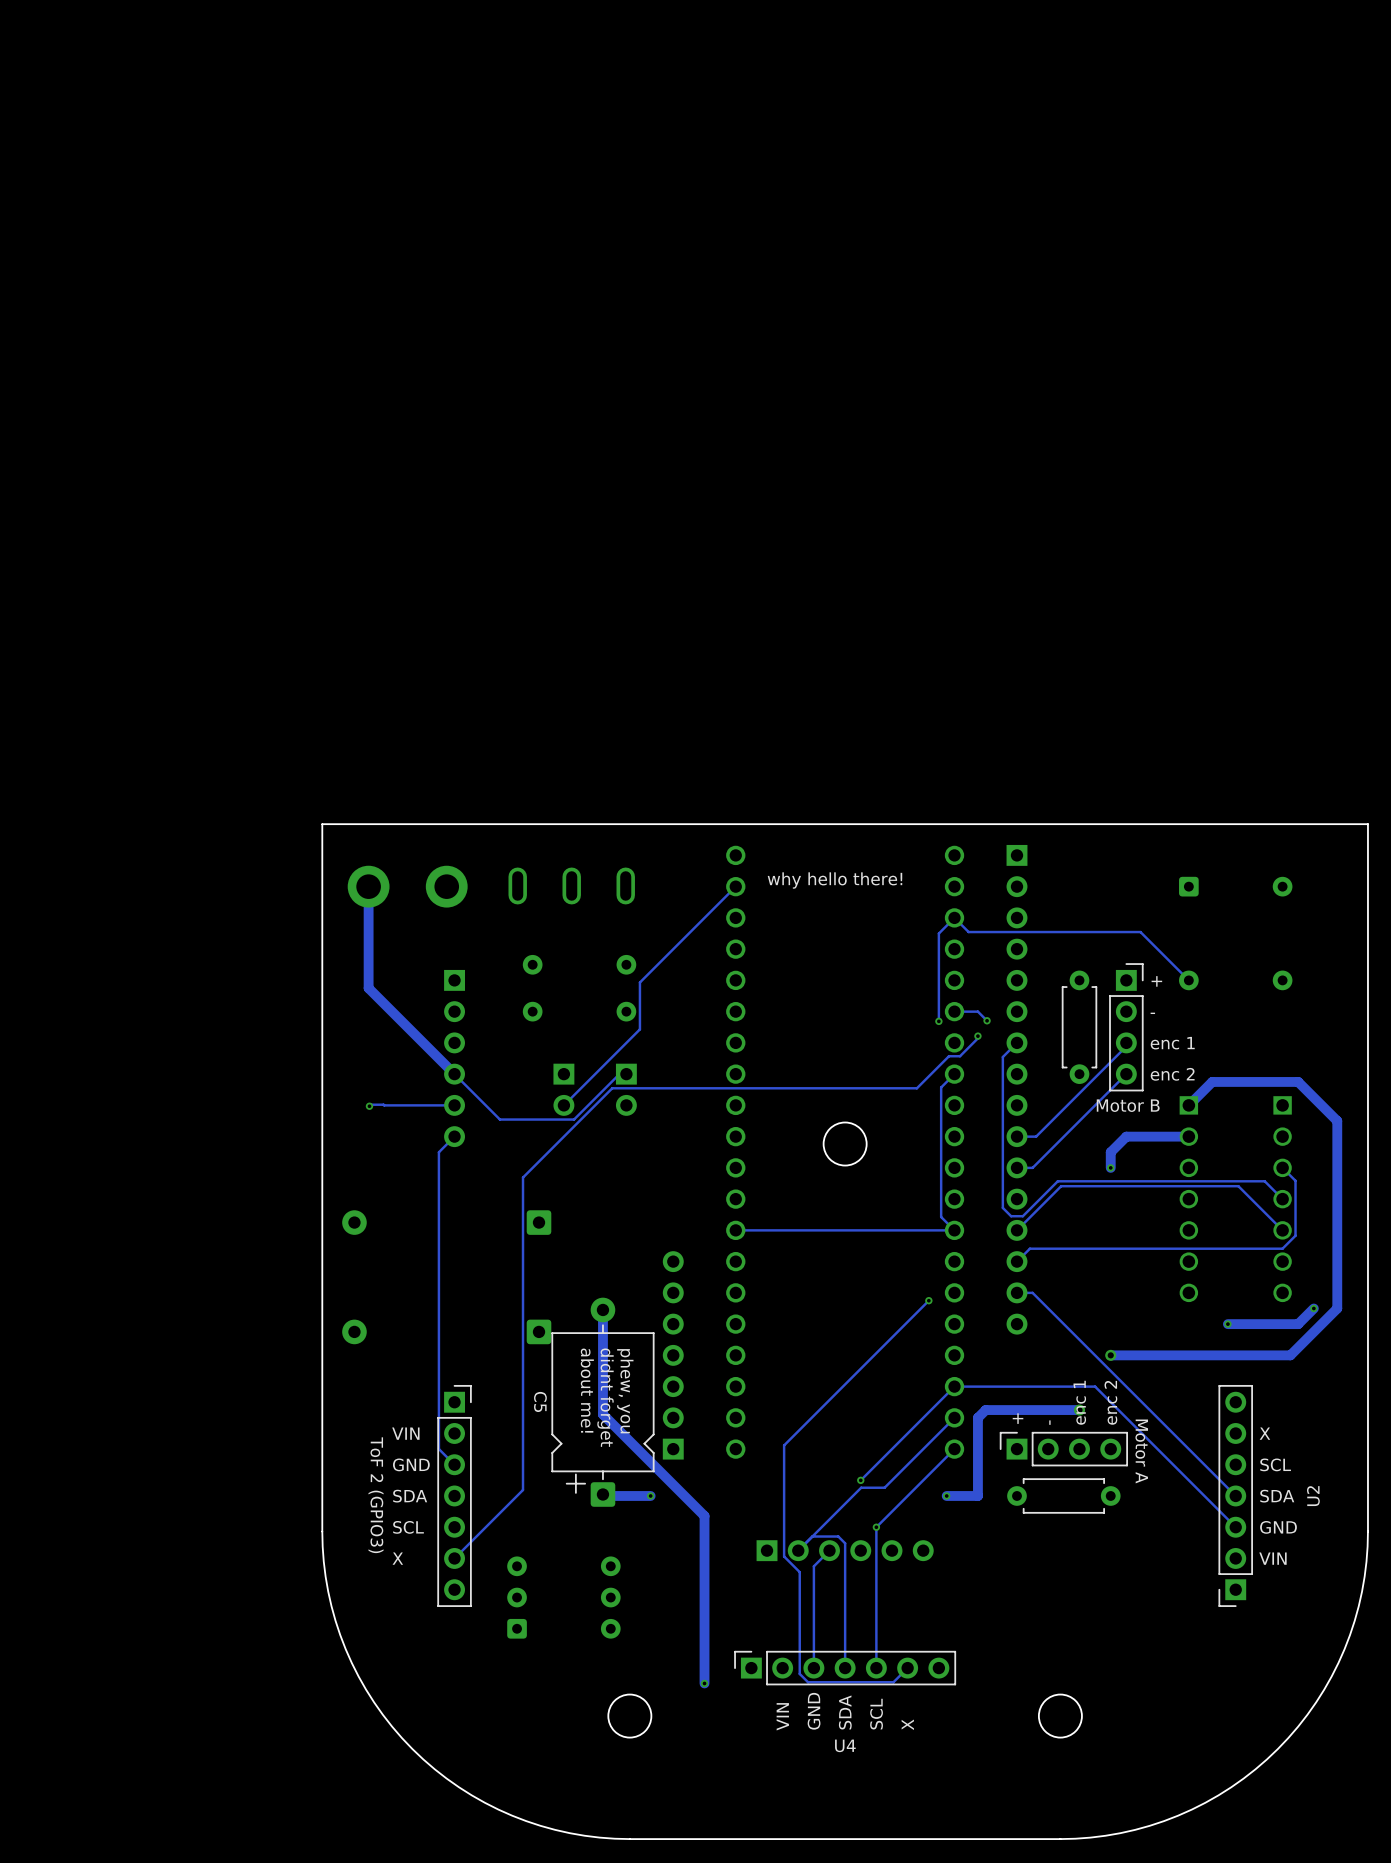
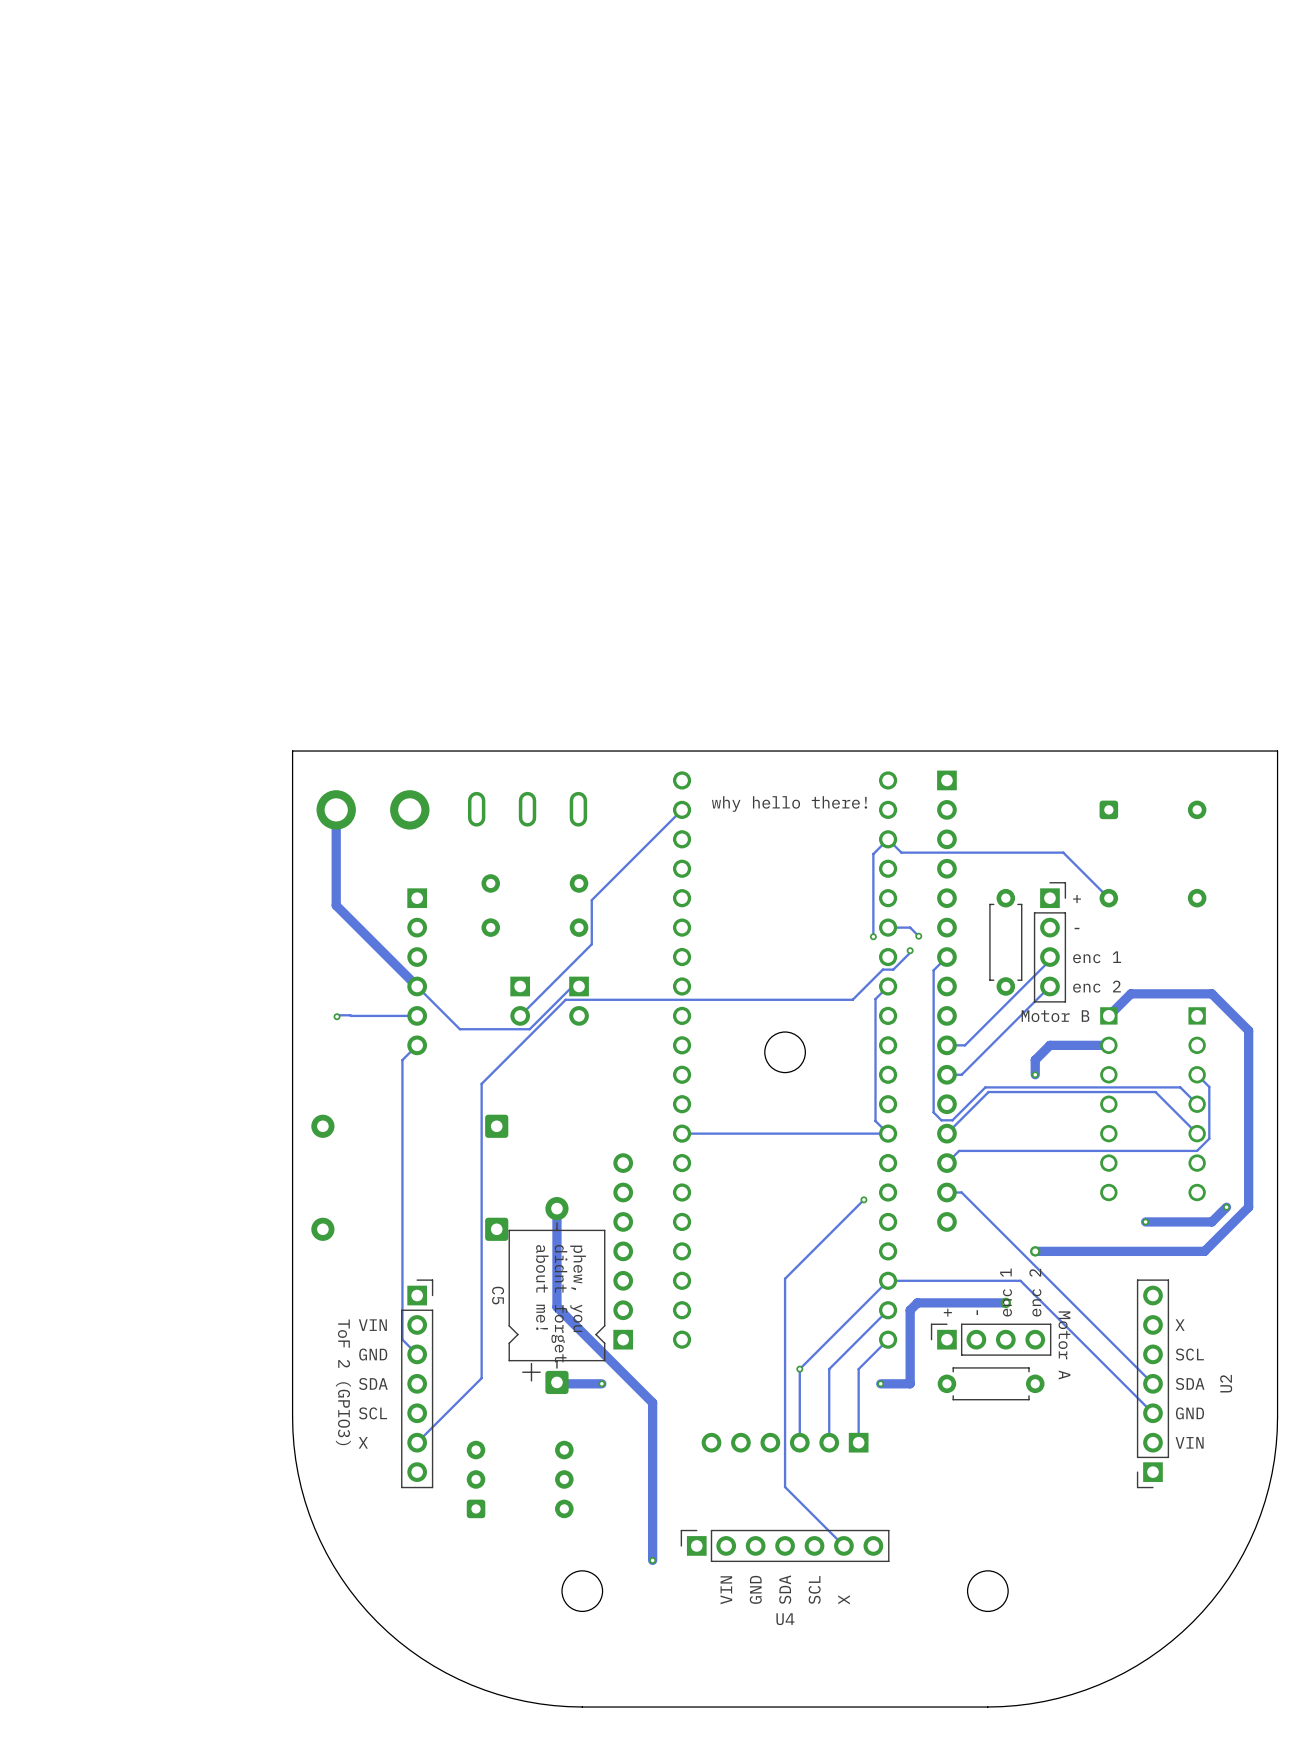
track: (845, 1384) (784, 1445) (784, 1556) (799, 1572) (799, 1673) (808, 1682) (893, 1682) (907, 1668) -> (785, 1278) (785, 1428)
track: none -> (799, 1369) (799, 1442)
track: (892, 1480) (884, 1487) (861, 1487) (798, 1550) -> (829, 1369) (829, 1442)
track: (923, 1480) (876, 1527) (876, 1668) -> (858, 1369) (858, 1442)
via: (876, 1527) -> none
track: (812, 1536) (838, 1536) (845, 1543) -> none
track: (829, 1550) (813, 1566) (813, 1668) -> none
part rotation: 0° (845, 1550) -> 180° (785, 1442)
track: (845, 1605) (845, 1668) -> (785, 1487) (843, 1545)

